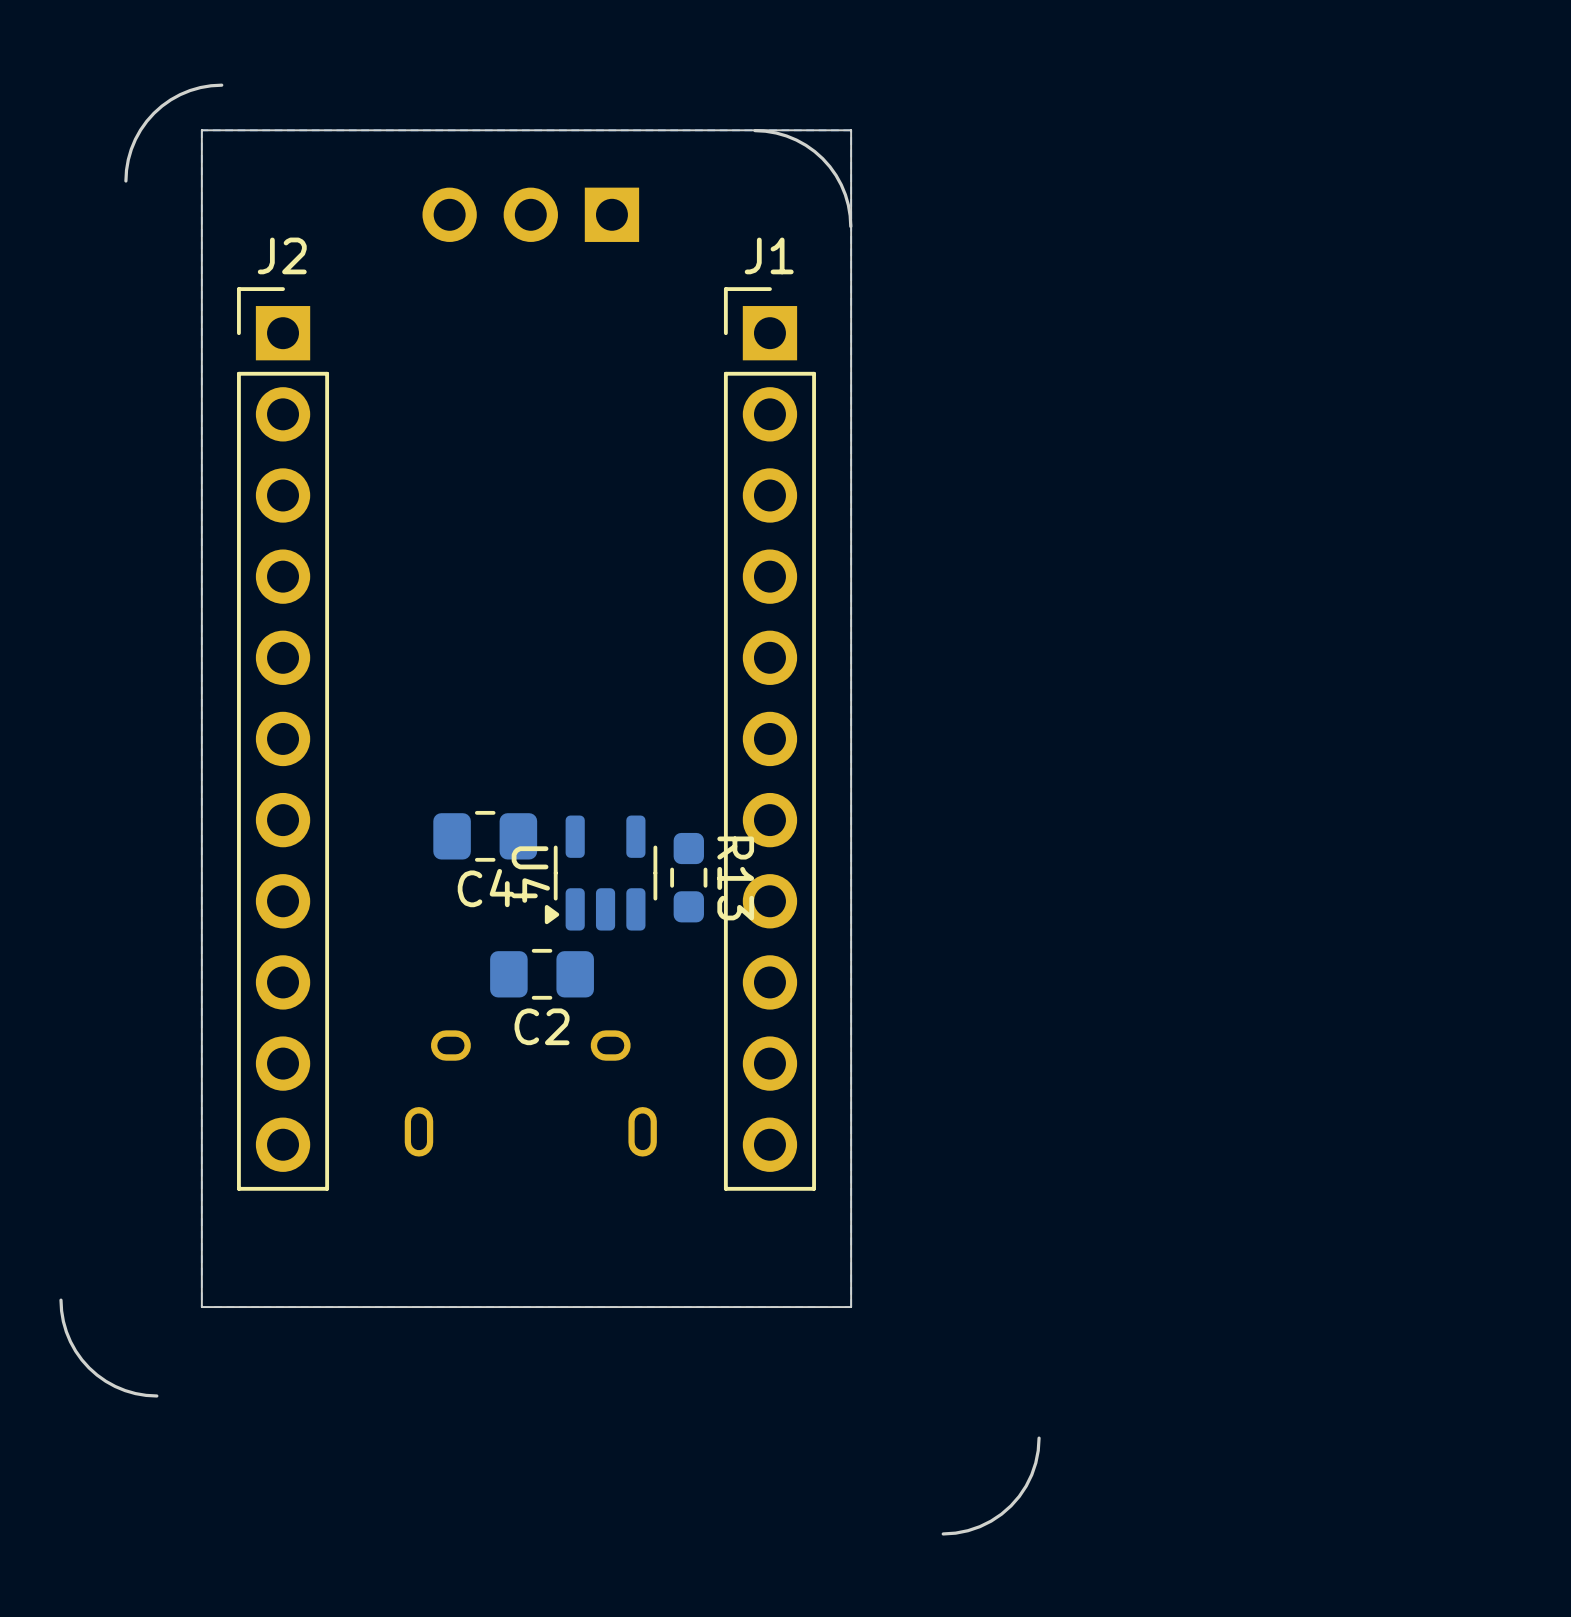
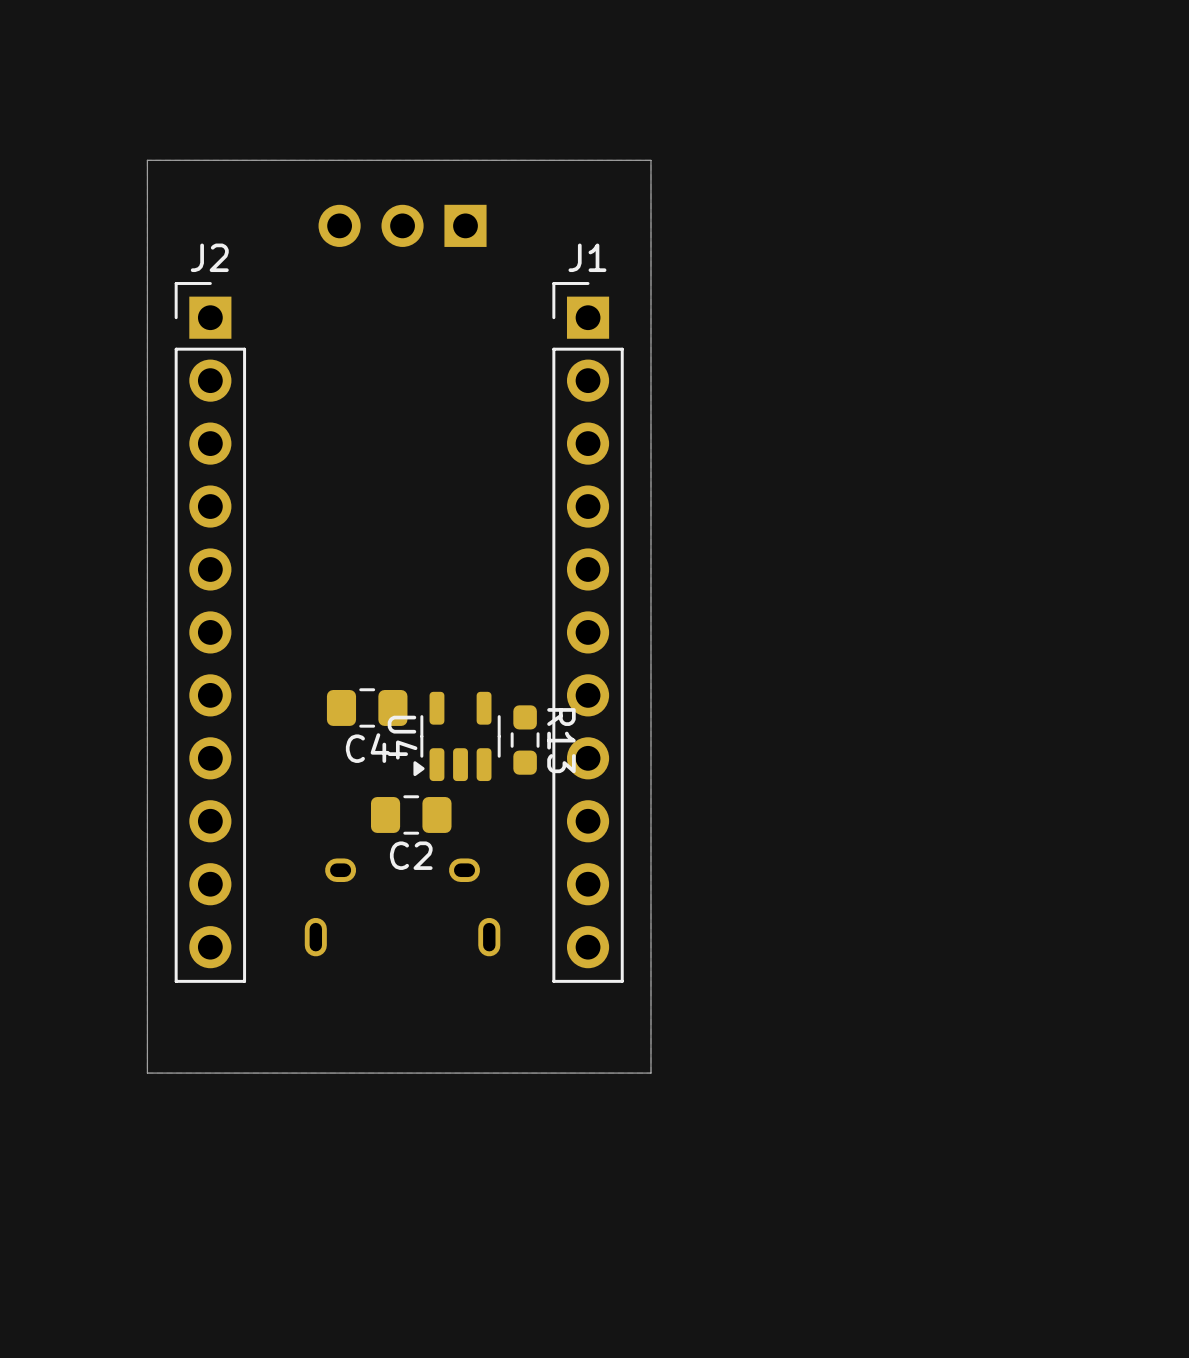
board edge: (221, 85) (190, 90) (170, 99) (153, 113) (135, 139) (128, 159) (125, 181) -> none
board edge: (754, 130) (776, 133) (796, 140) (822, 158) (836, 175) (845, 194) (850, 226) -> none
board edge: (60, 1300) (66, 1331) (75, 1351) (89, 1367) (105, 1381) (125, 1390) (156, 1395) -> none
board edge: (1039, 1438) (1038, 1450) (1031, 1474) (1019, 1496) (1010, 1505) (1001, 1514) (979, 1526) (955, 1533) (943, 1533) -> none

